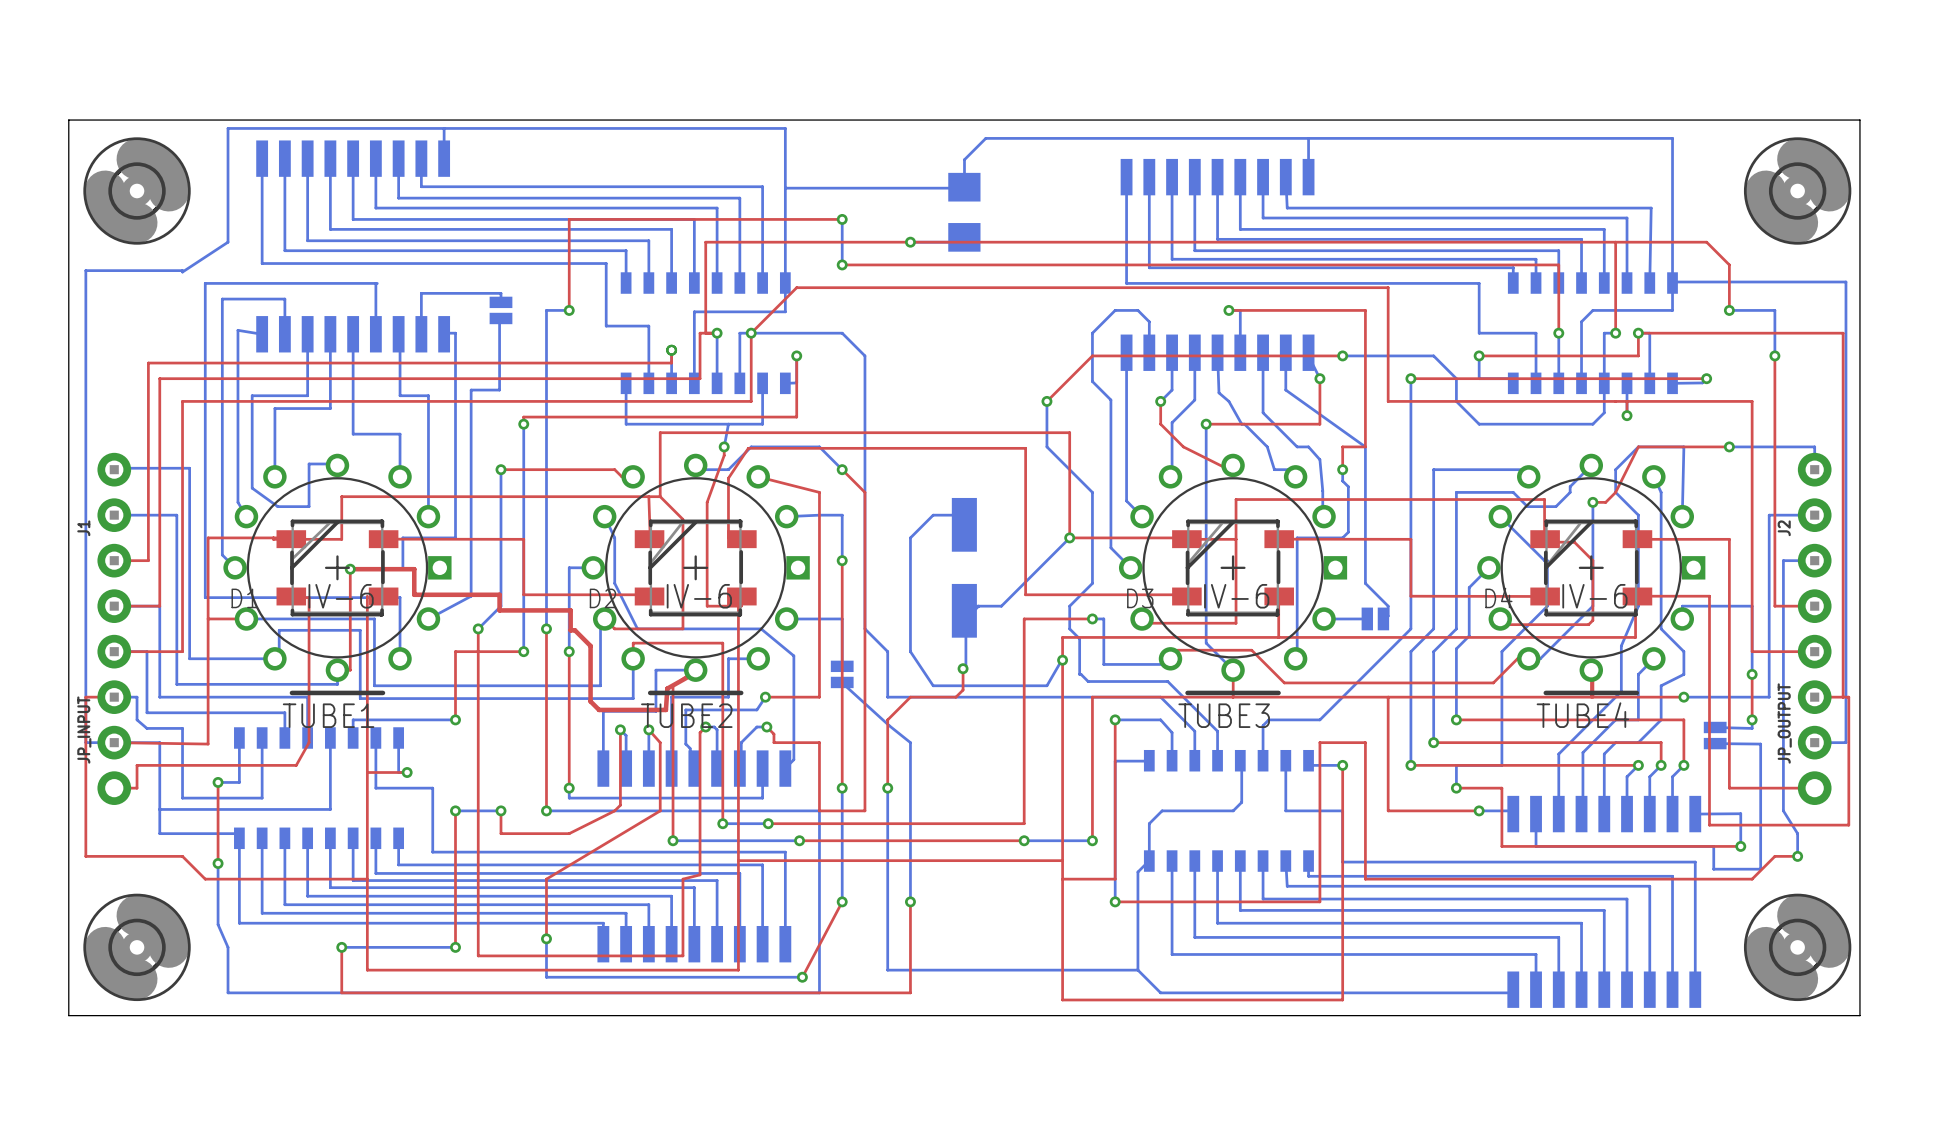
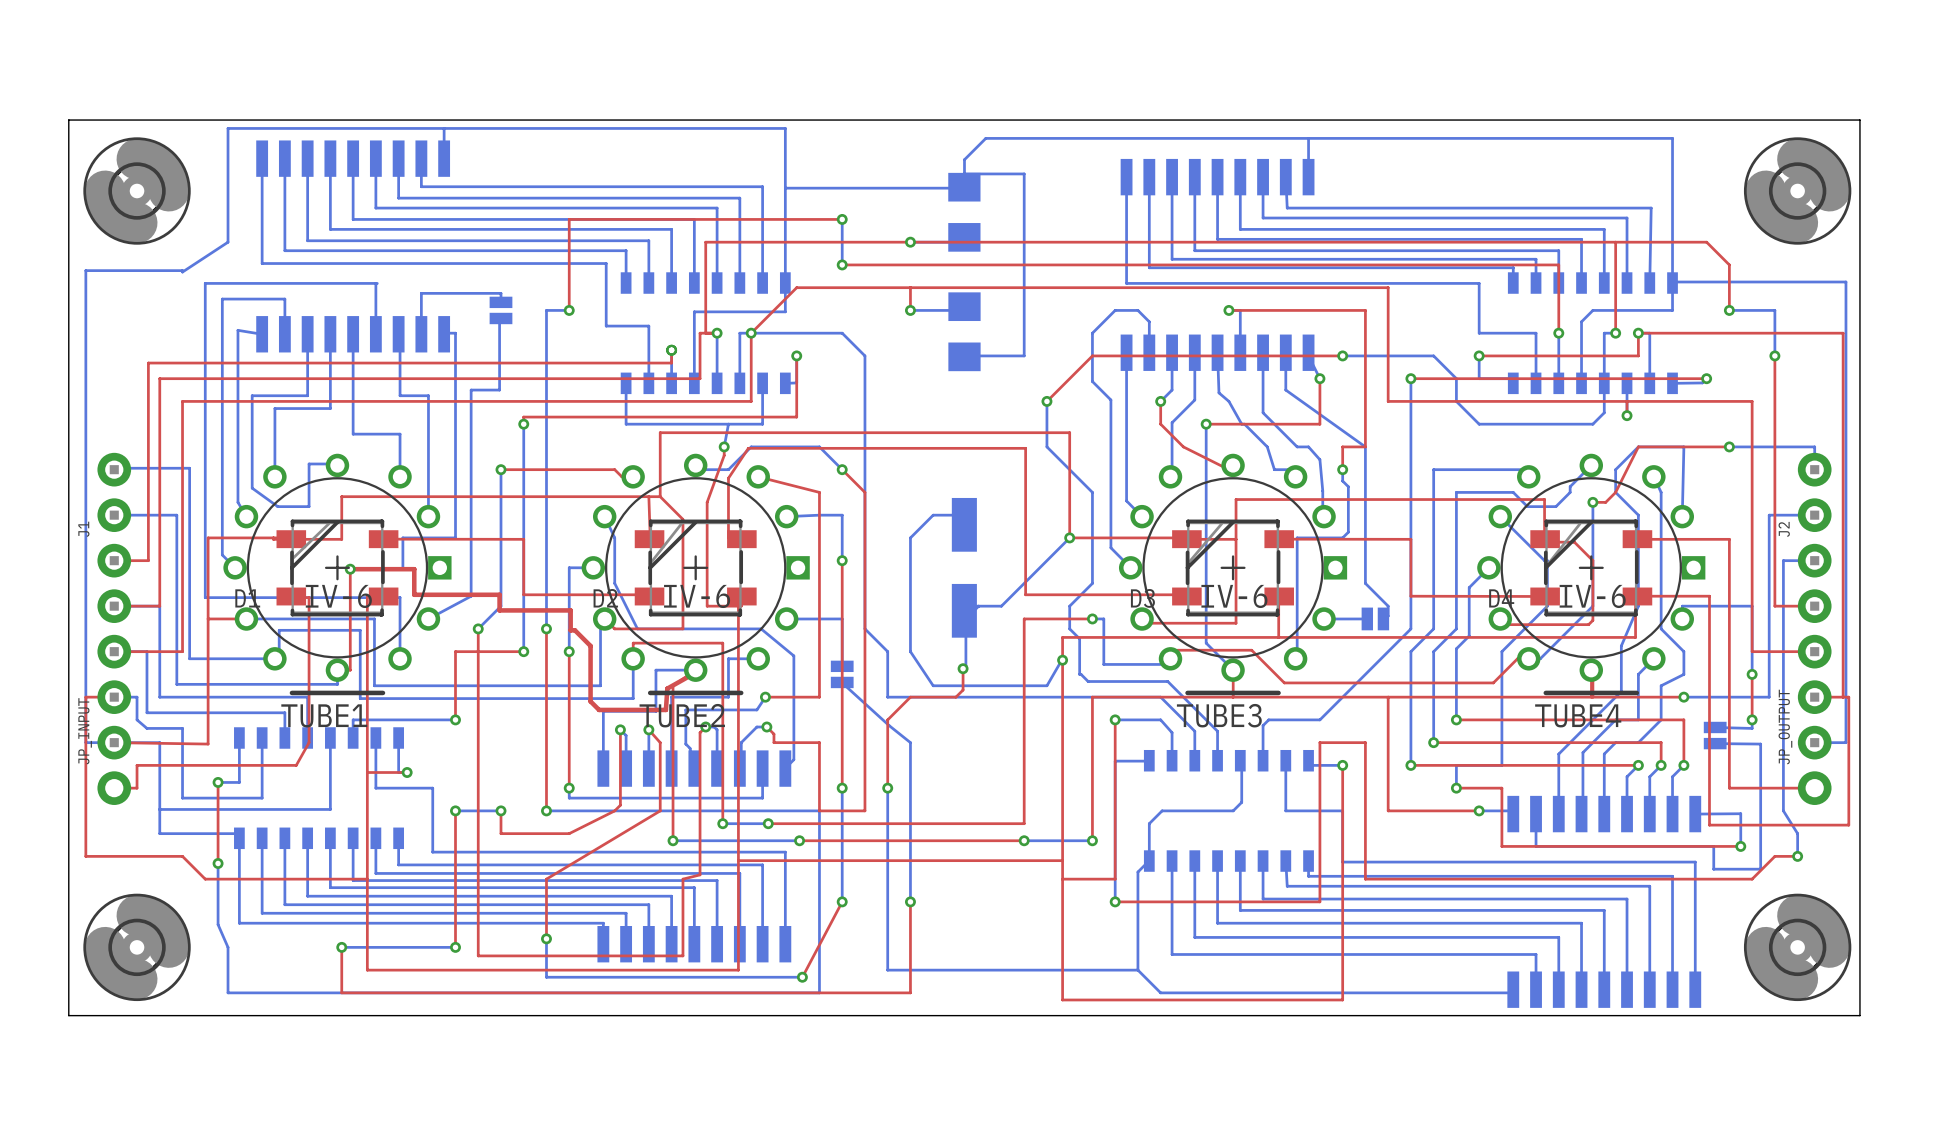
bottom track: none -> (964, 173) (1024, 173) (1024, 355) (964, 357)
top track: none -> (910, 287) (910, 310)
bottom track: none -> (964, 306) (955, 310) (910, 310)
via: none -> (910, 310)
part: none -> (964, 331)

